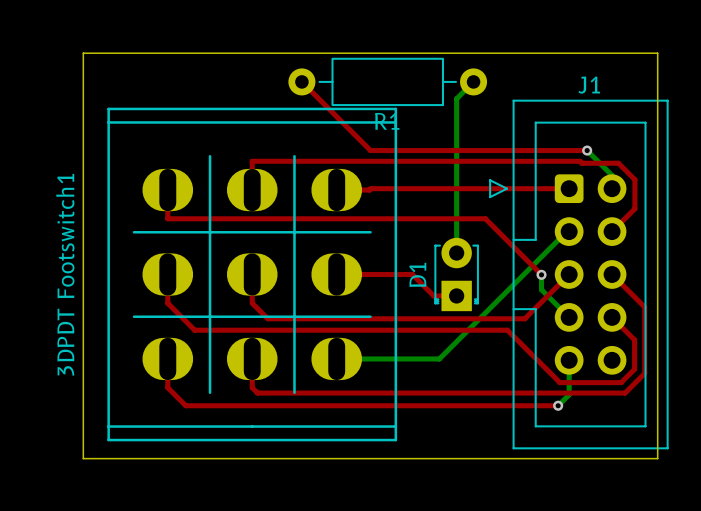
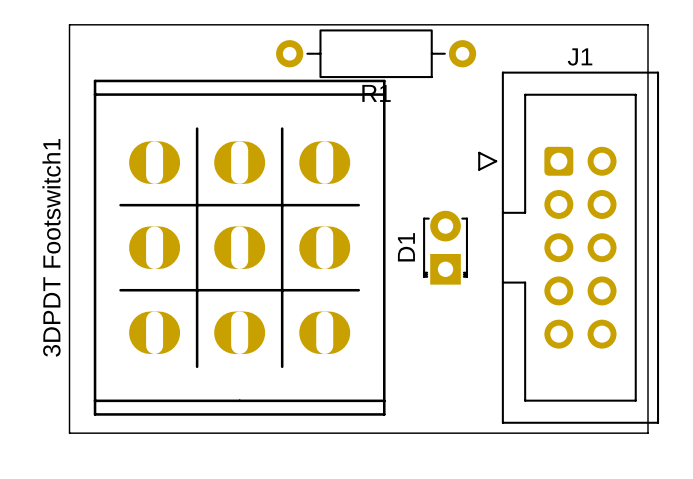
top track: (301, 81) (370, 150) (587, 150) -> none
bottom track: (473, 81) (456, 98) (456, 253) -> none
bottom track: (587, 150) (612, 175) (612, 188) -> none
via: (587, 150) -> none
top track: (569, 188) (336, 190) -> none
top track: (167, 190) (167, 218) (485, 218) (541, 274) -> none
top track: (252, 190) (252, 161) (579, 161) (581, 163) (618, 163) (634, 179) (634, 208) (612, 231) -> none
bottom track: (569, 231) (566, 231) (439, 358) (336, 358) -> none
top track: (167, 274) (167, 303) (194, 330) (507, 330) (559, 382) (621, 382) (634, 369) (634, 339) (612, 317) -> none
top track: (252, 274) (252, 303) (267, 318) (524, 318) (569, 274) -> none
top track: (336, 274) (412, 274) (433, 295) (456, 295) -> none
bottom track: (541, 274) (541, 289) (569, 317) -> none
via: (541, 274) -> none
top track: (612, 274) (644, 307) (644, 373) (625, 393) (257, 393) (252, 387) (252, 358) -> none
top track: (167, 358) (167, 387) (185, 405) (558, 405) -> none
bottom track: (569, 360) (569, 394) (558, 405) -> none
via: (558, 405) -> none

